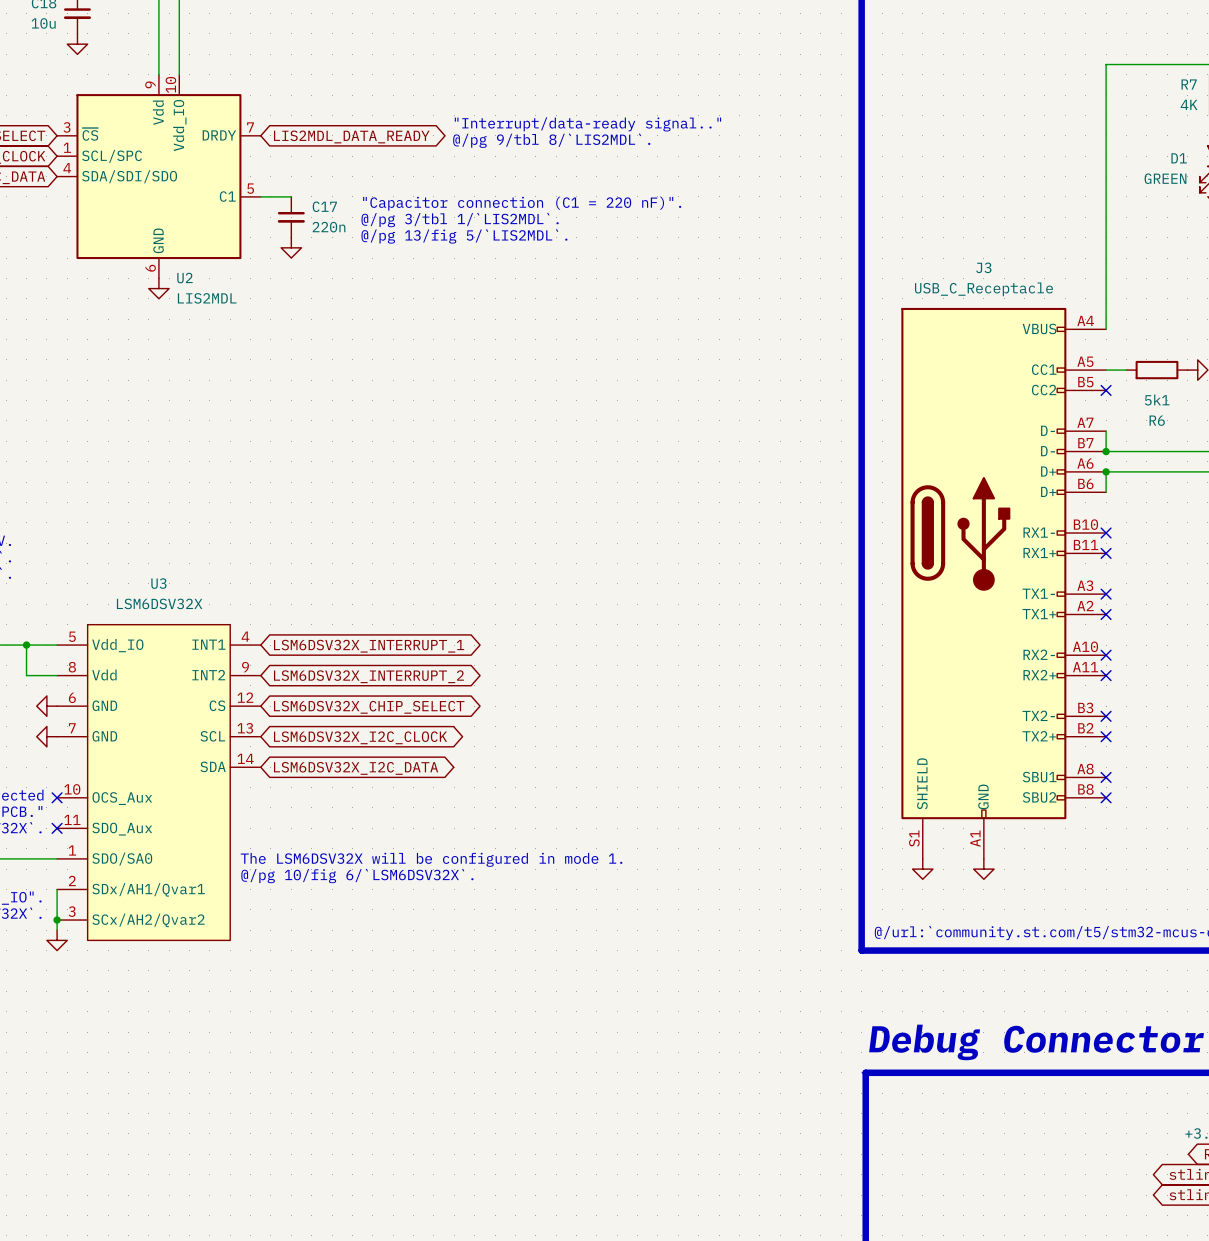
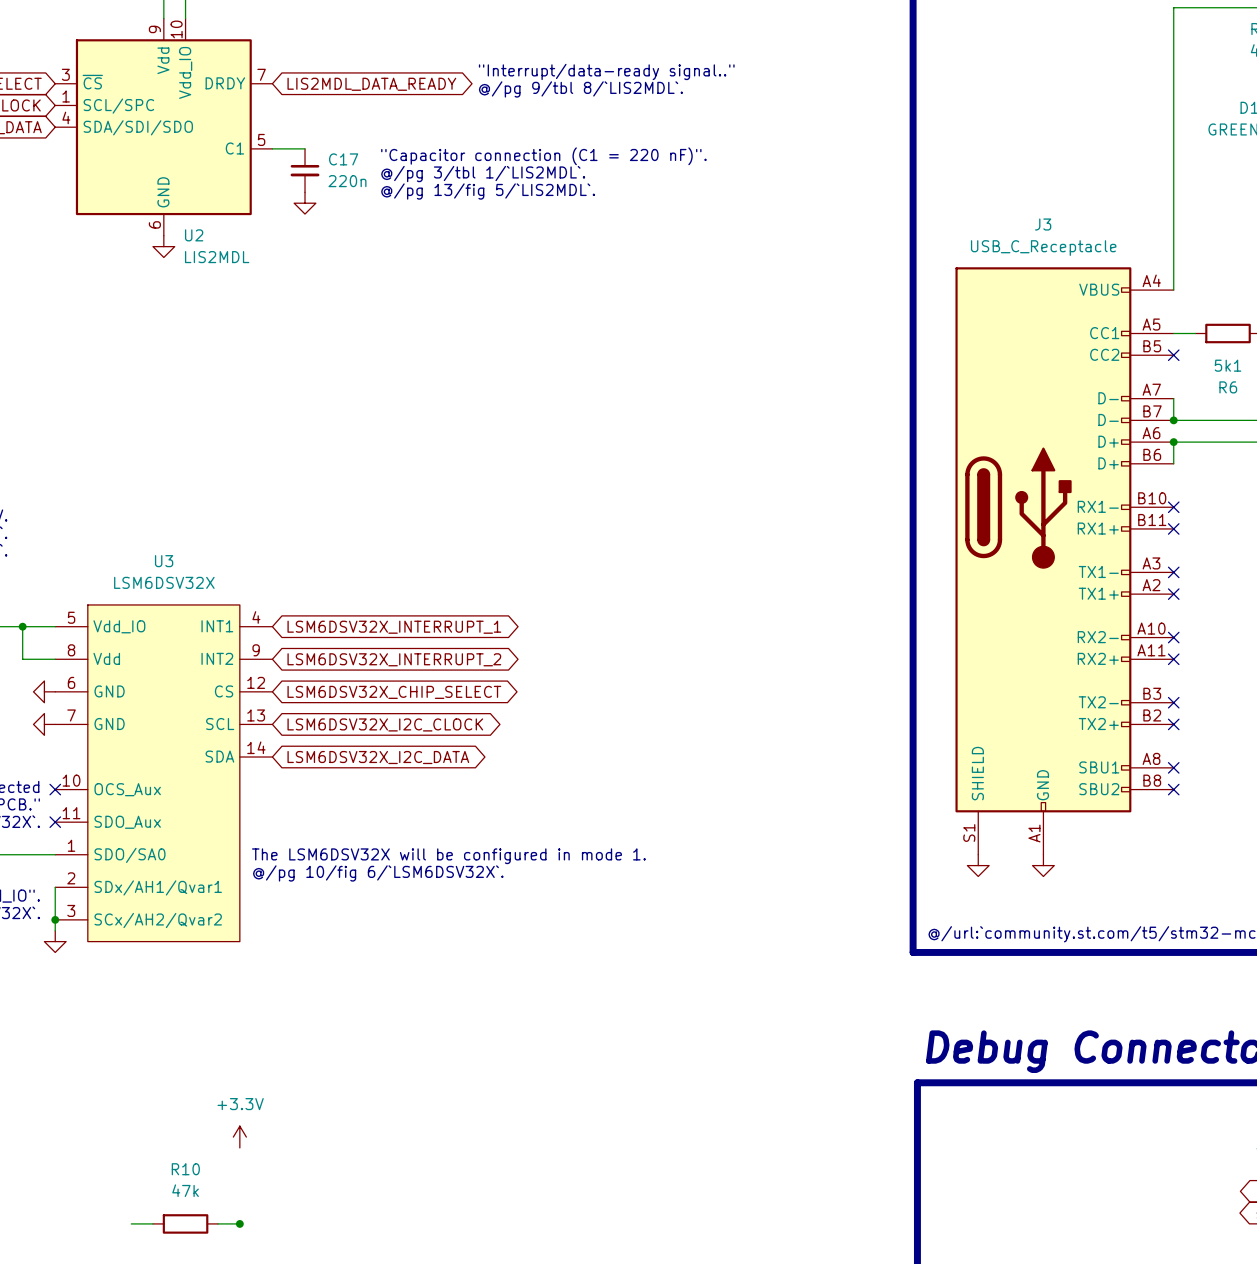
power symbol: none -> +3.3V (239, 1137)
wire: none -> (131, 1223) (152, 1223)
R10: none -> 47k (185, 1223)
wire: none -> (218, 1223) (239, 1223)
junction: none -> (239, 1223)

